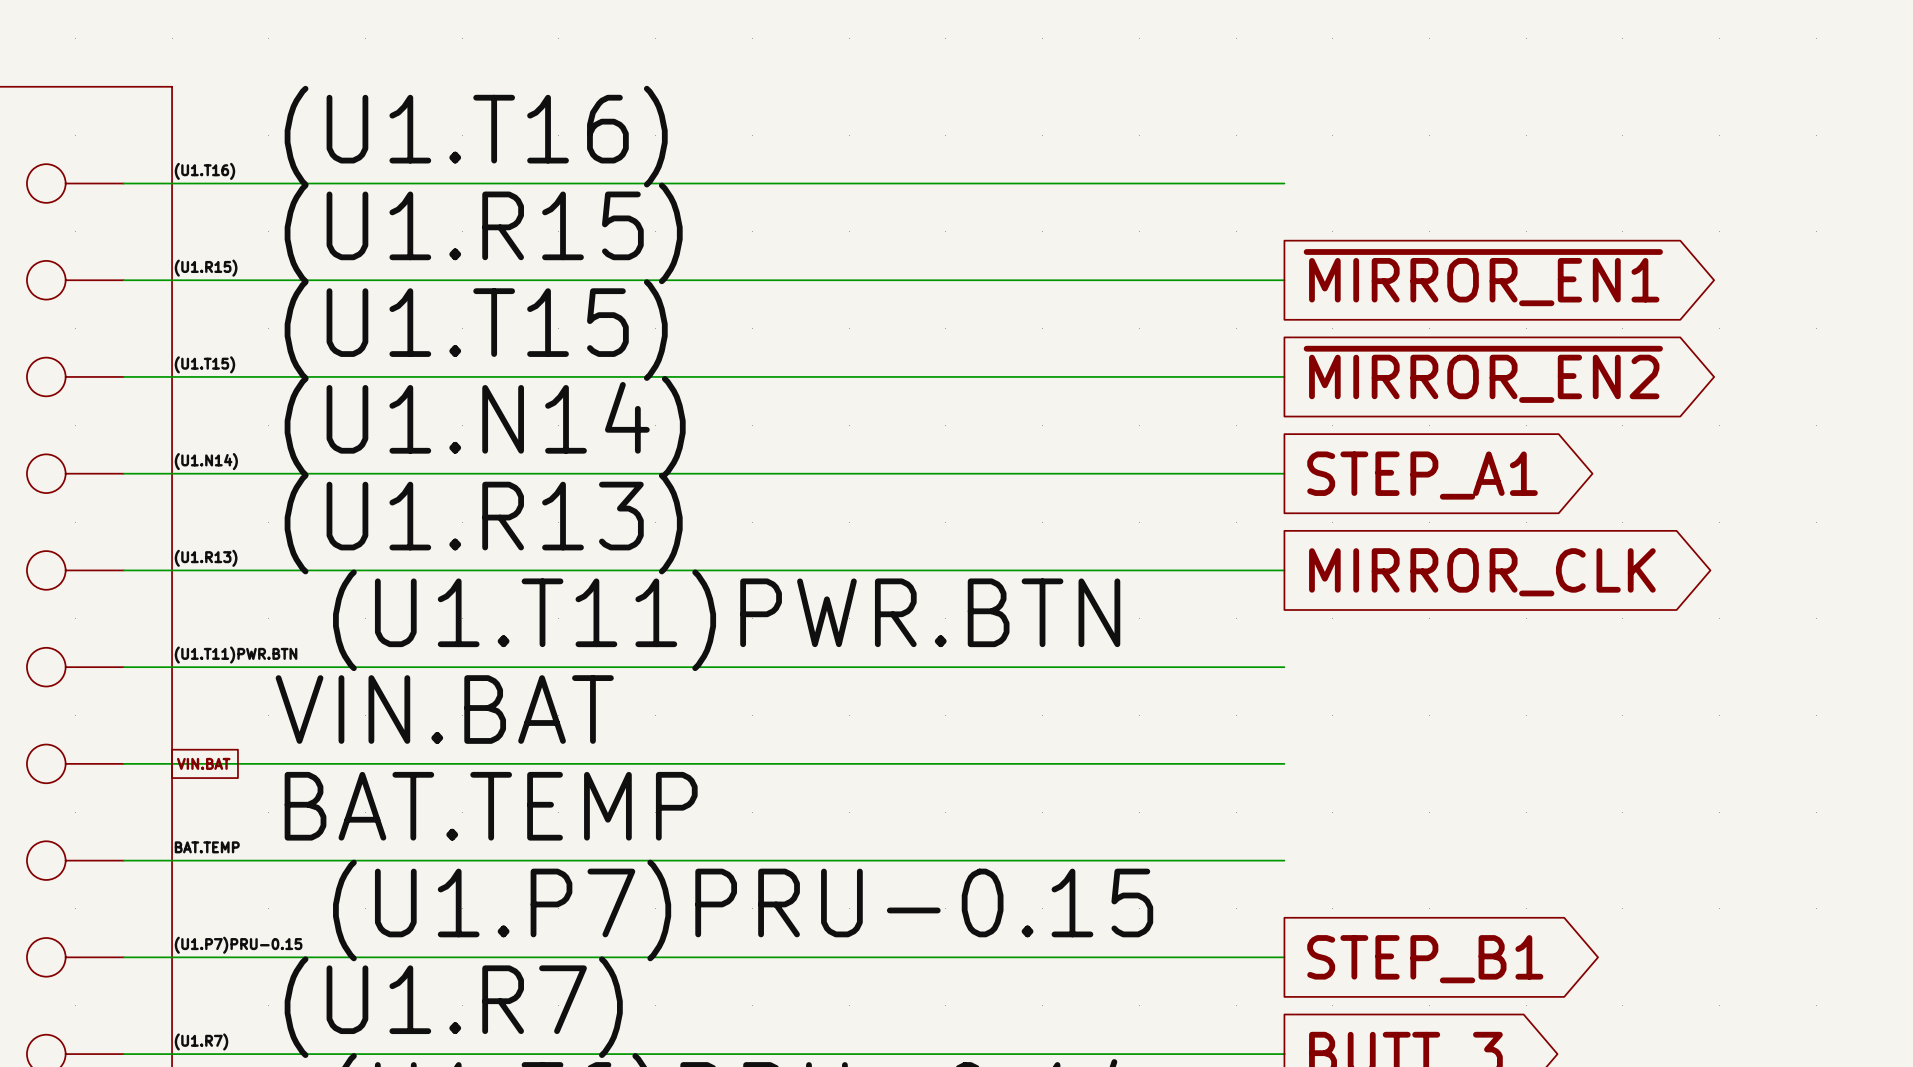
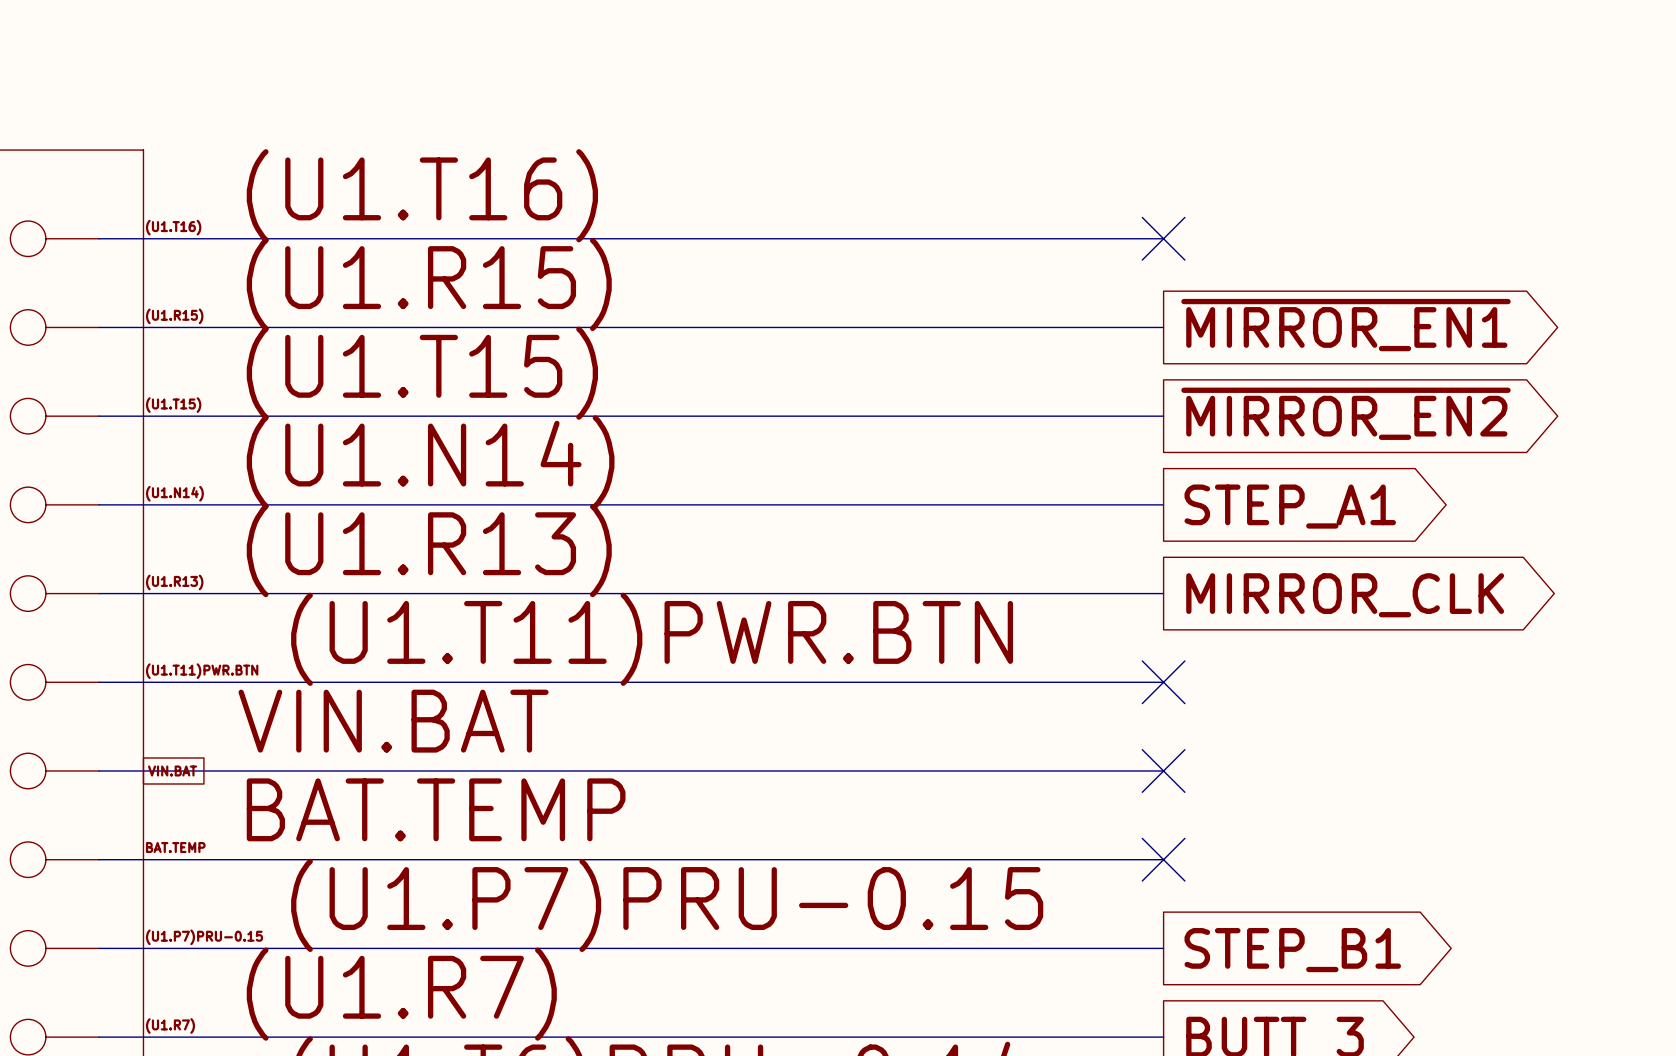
no-connect mark: none -> (1163, 238)
no-connect mark: none -> (1163, 682)
no-connect mark: none -> (1163, 770)
no-connect mark: none -> (1163, 859)

